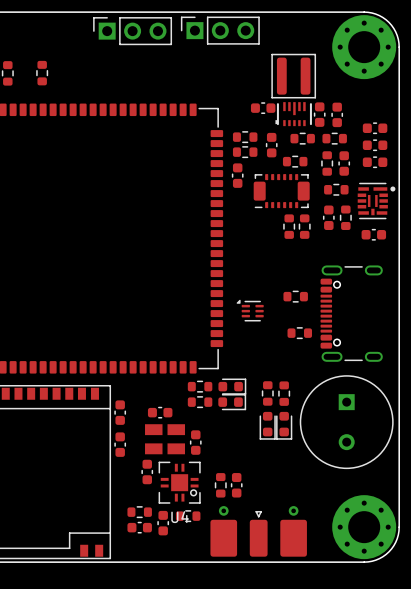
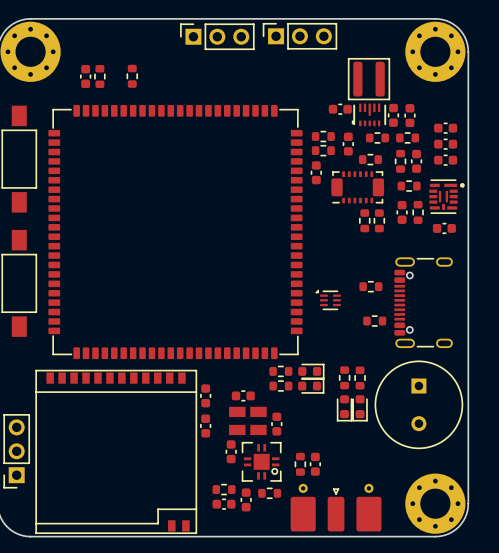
U4 name: U4 (180, 517) -> none

